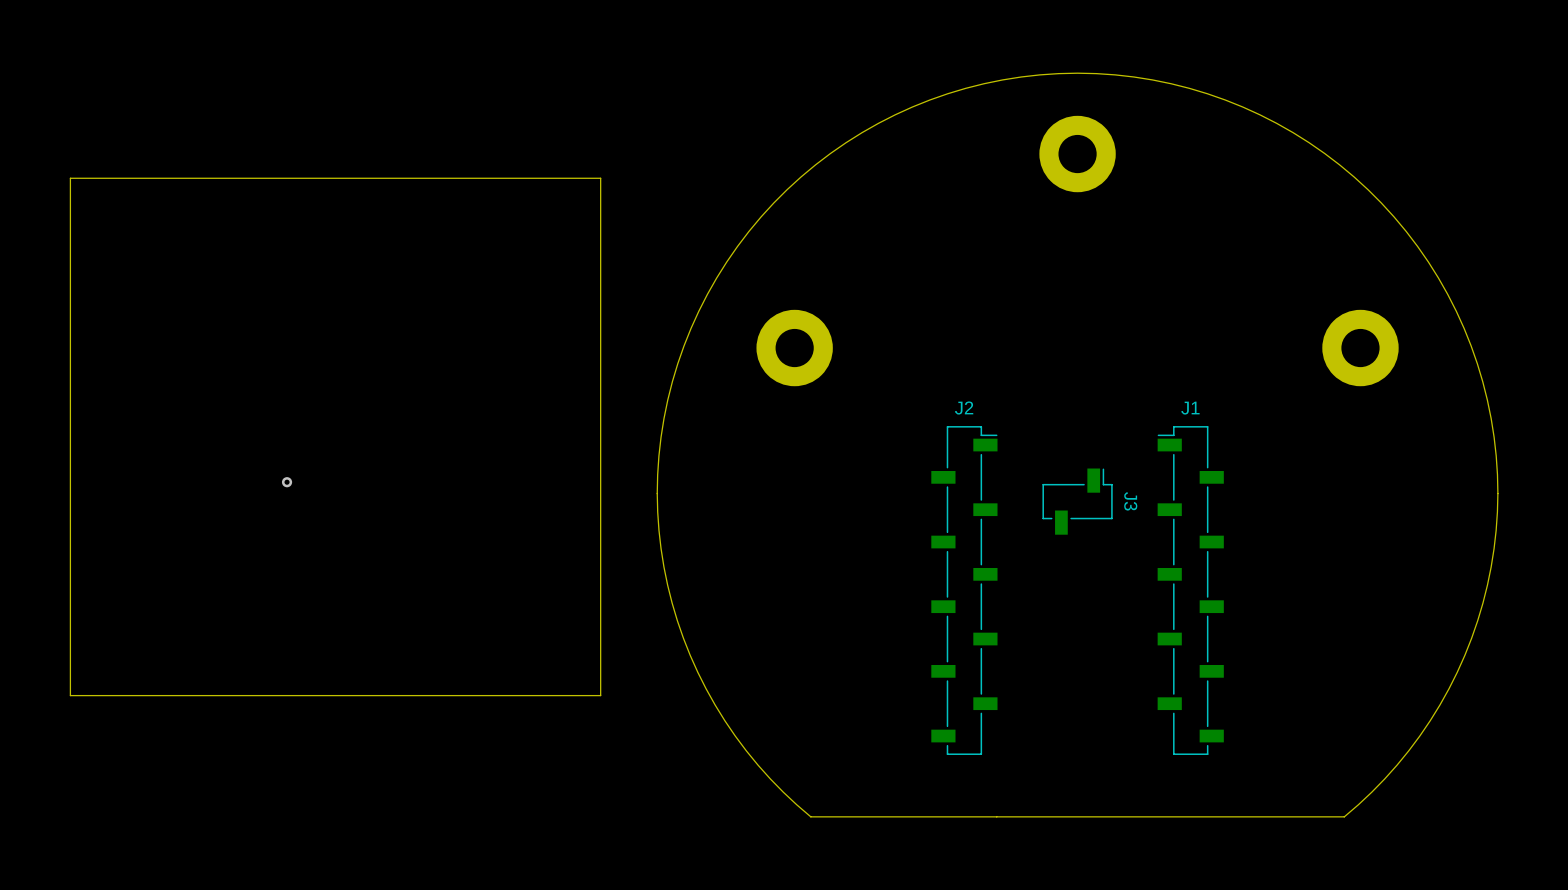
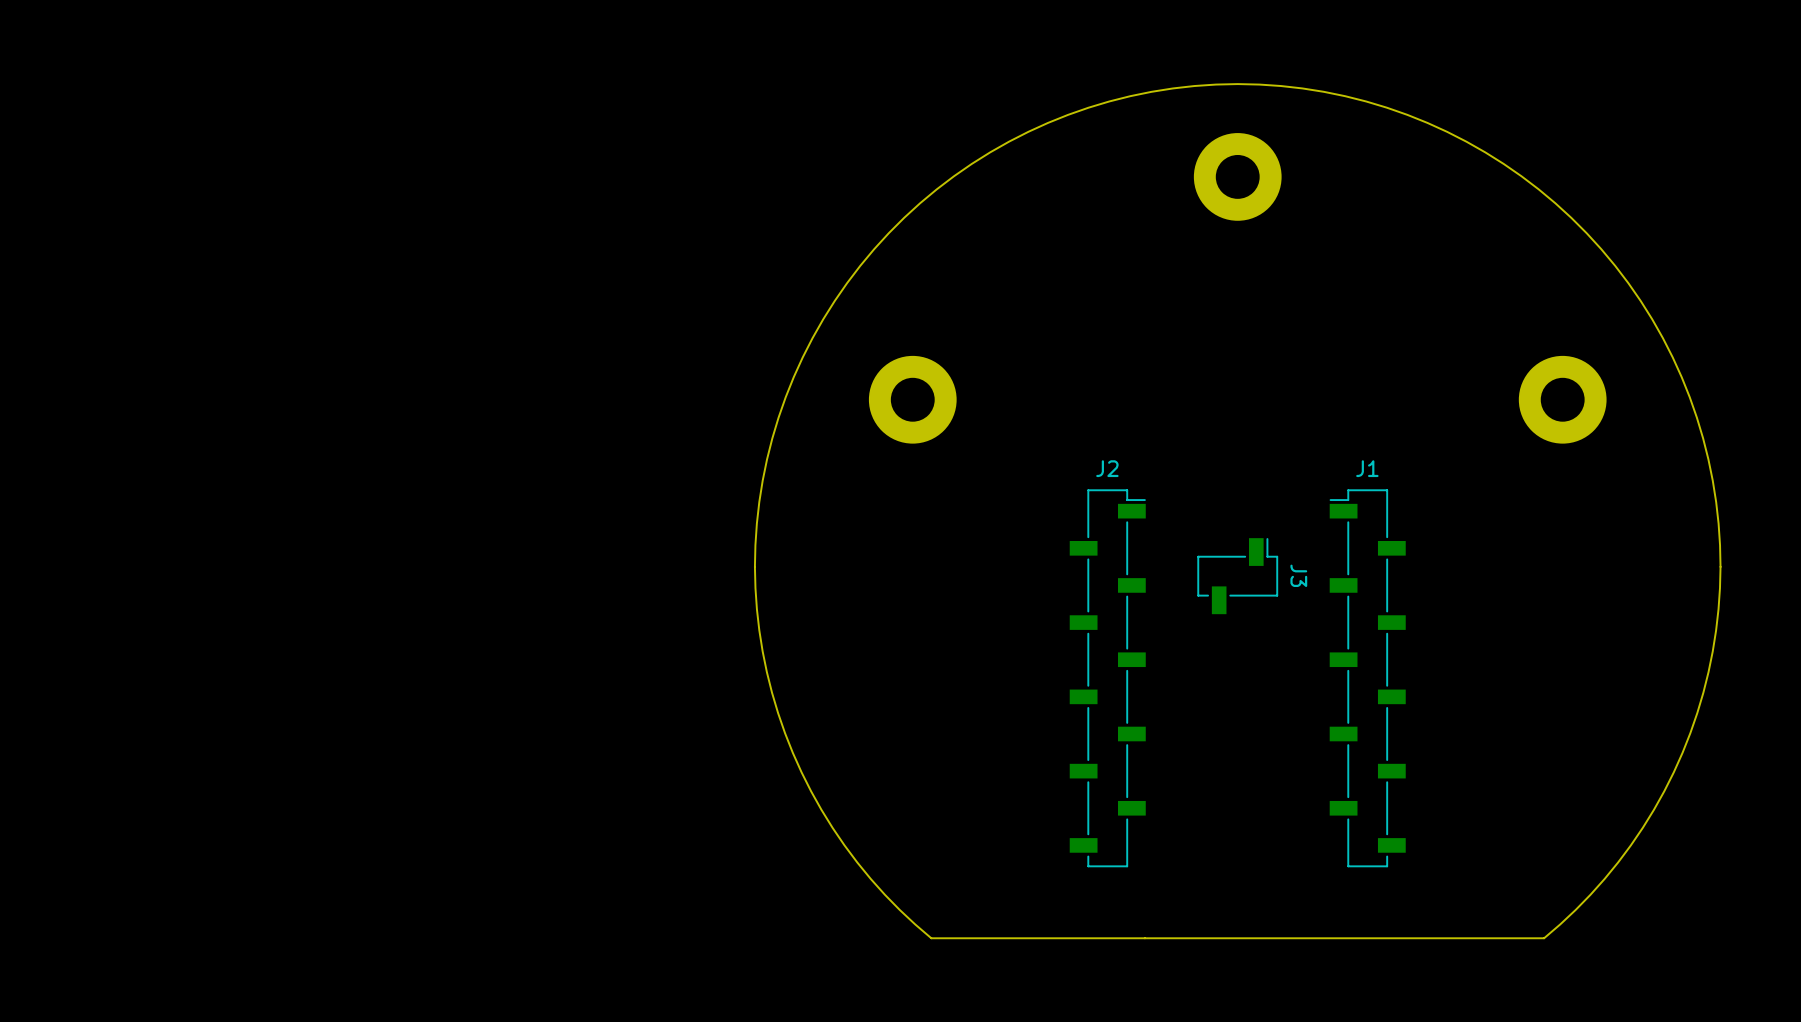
board edge: (600, 178) (70, 178) (70, 695) (600, 695) (600, 178) -> none
via: (287, 482) -> none

